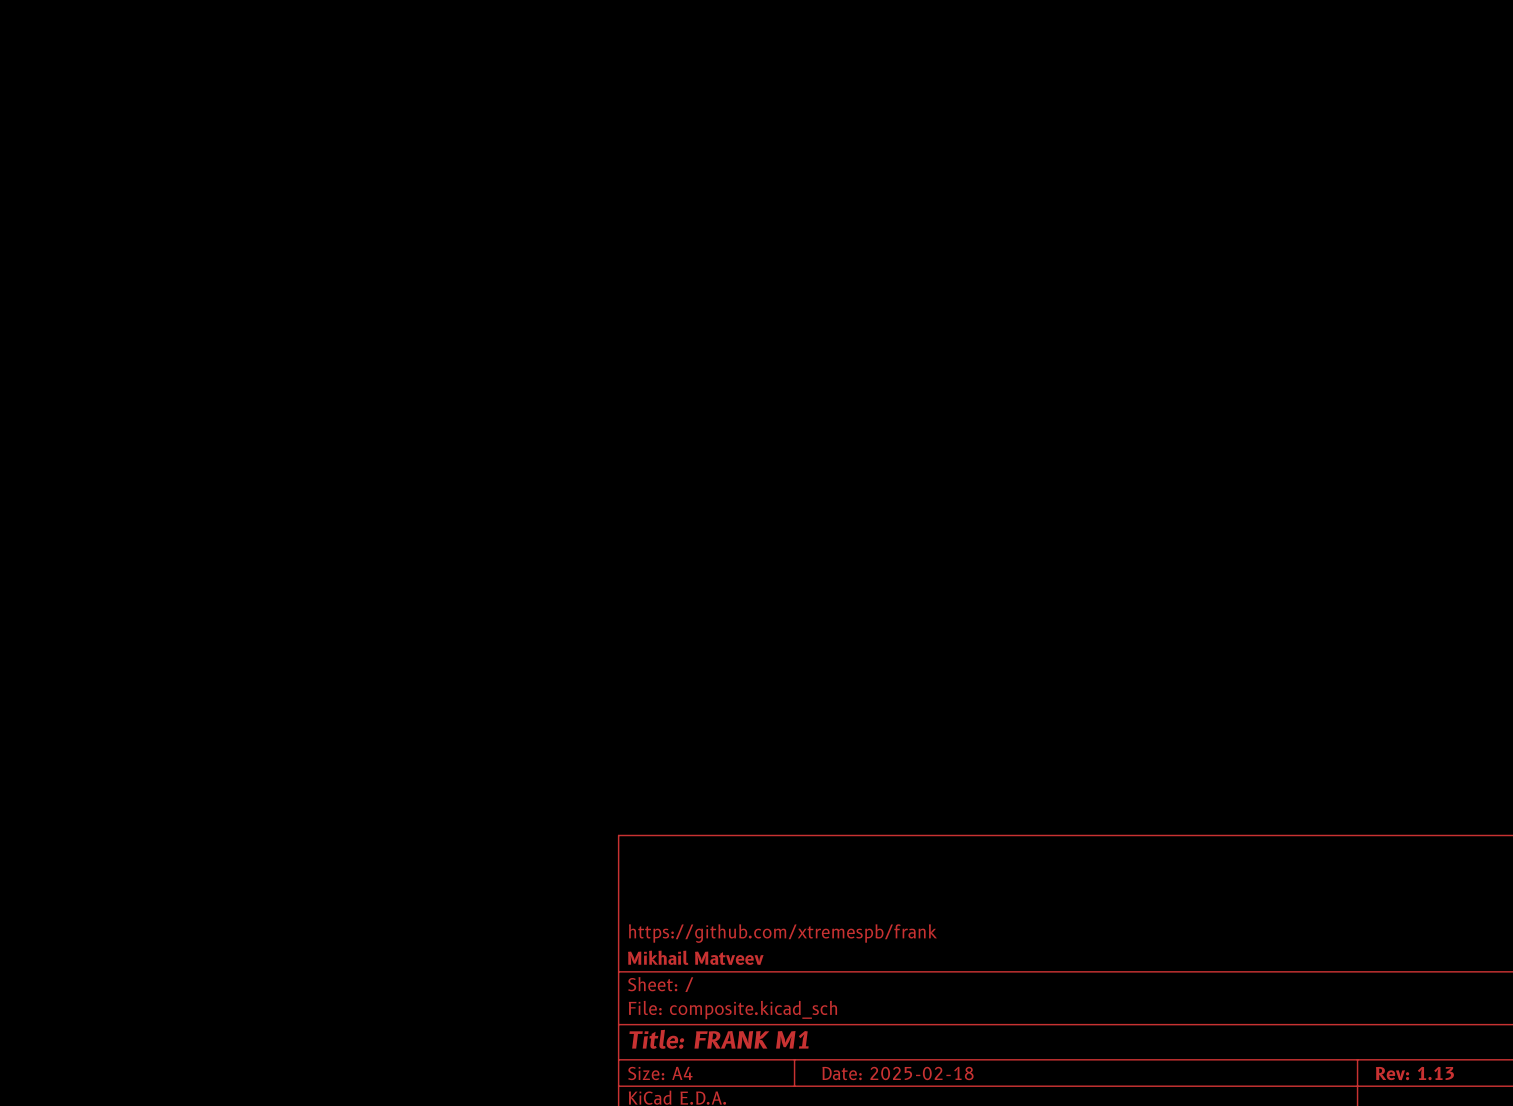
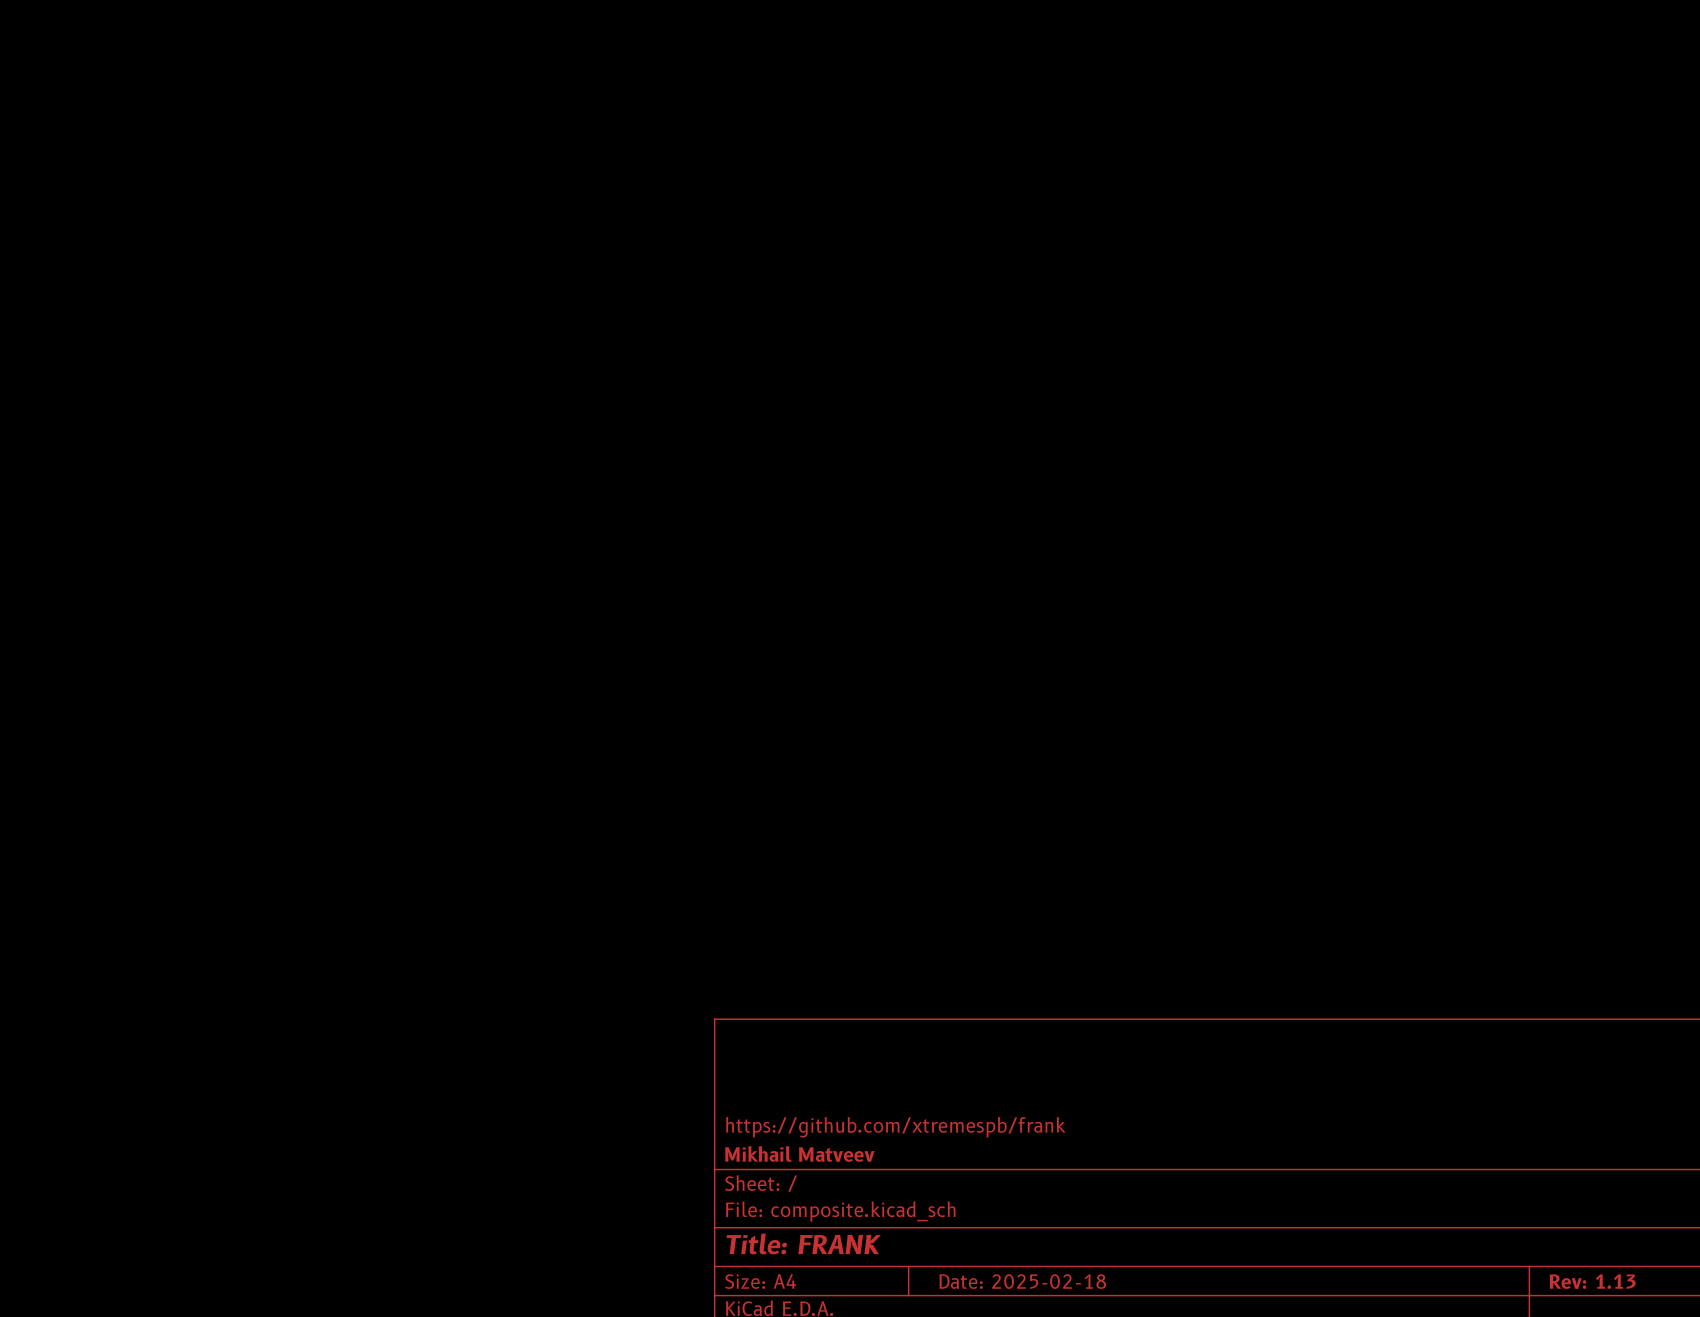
title block: Title: FRANK M1 (719, 1039) -> Title: FRANK (803, 1243)

